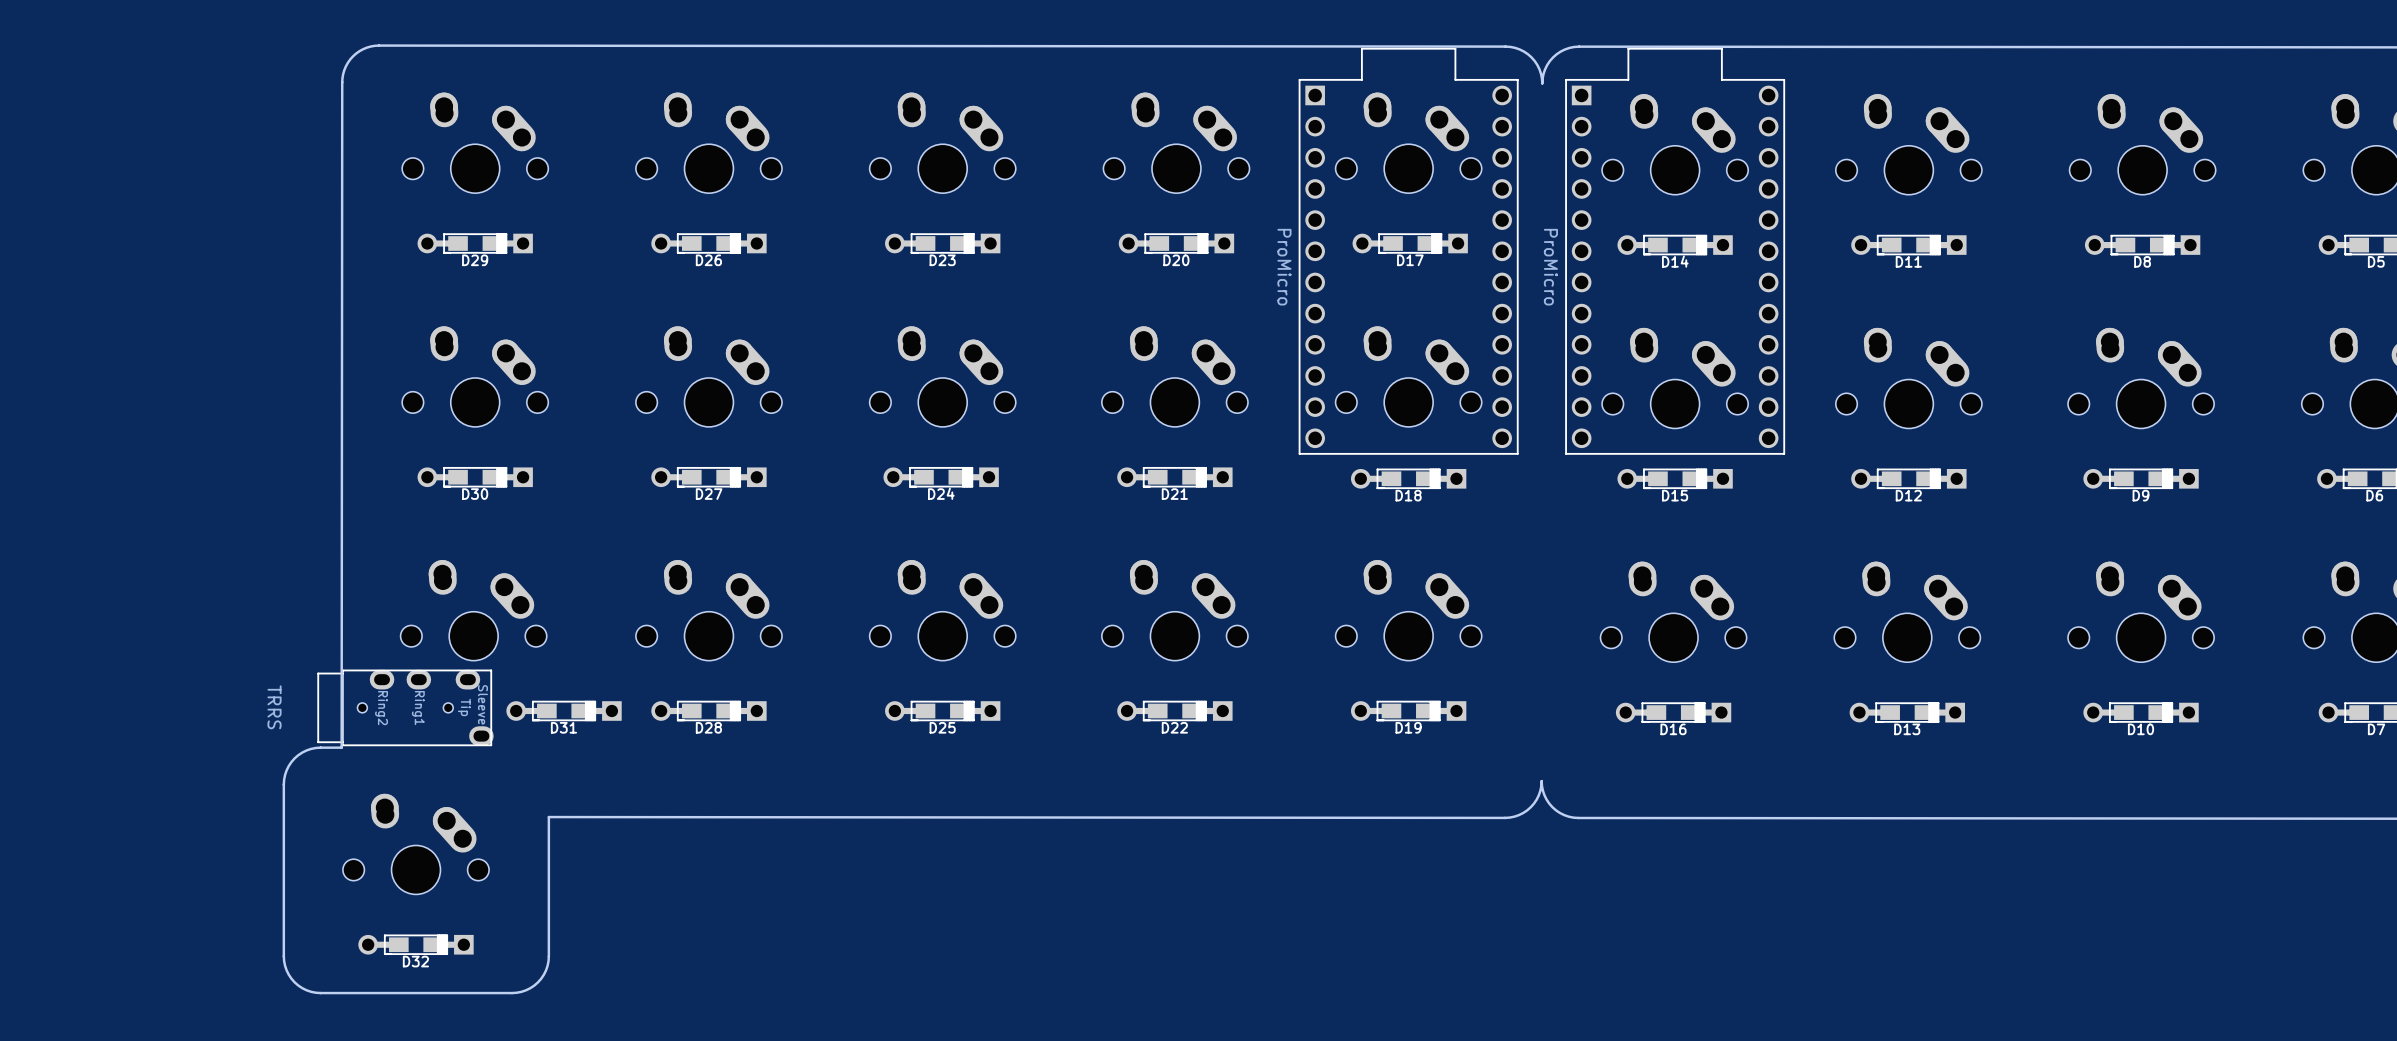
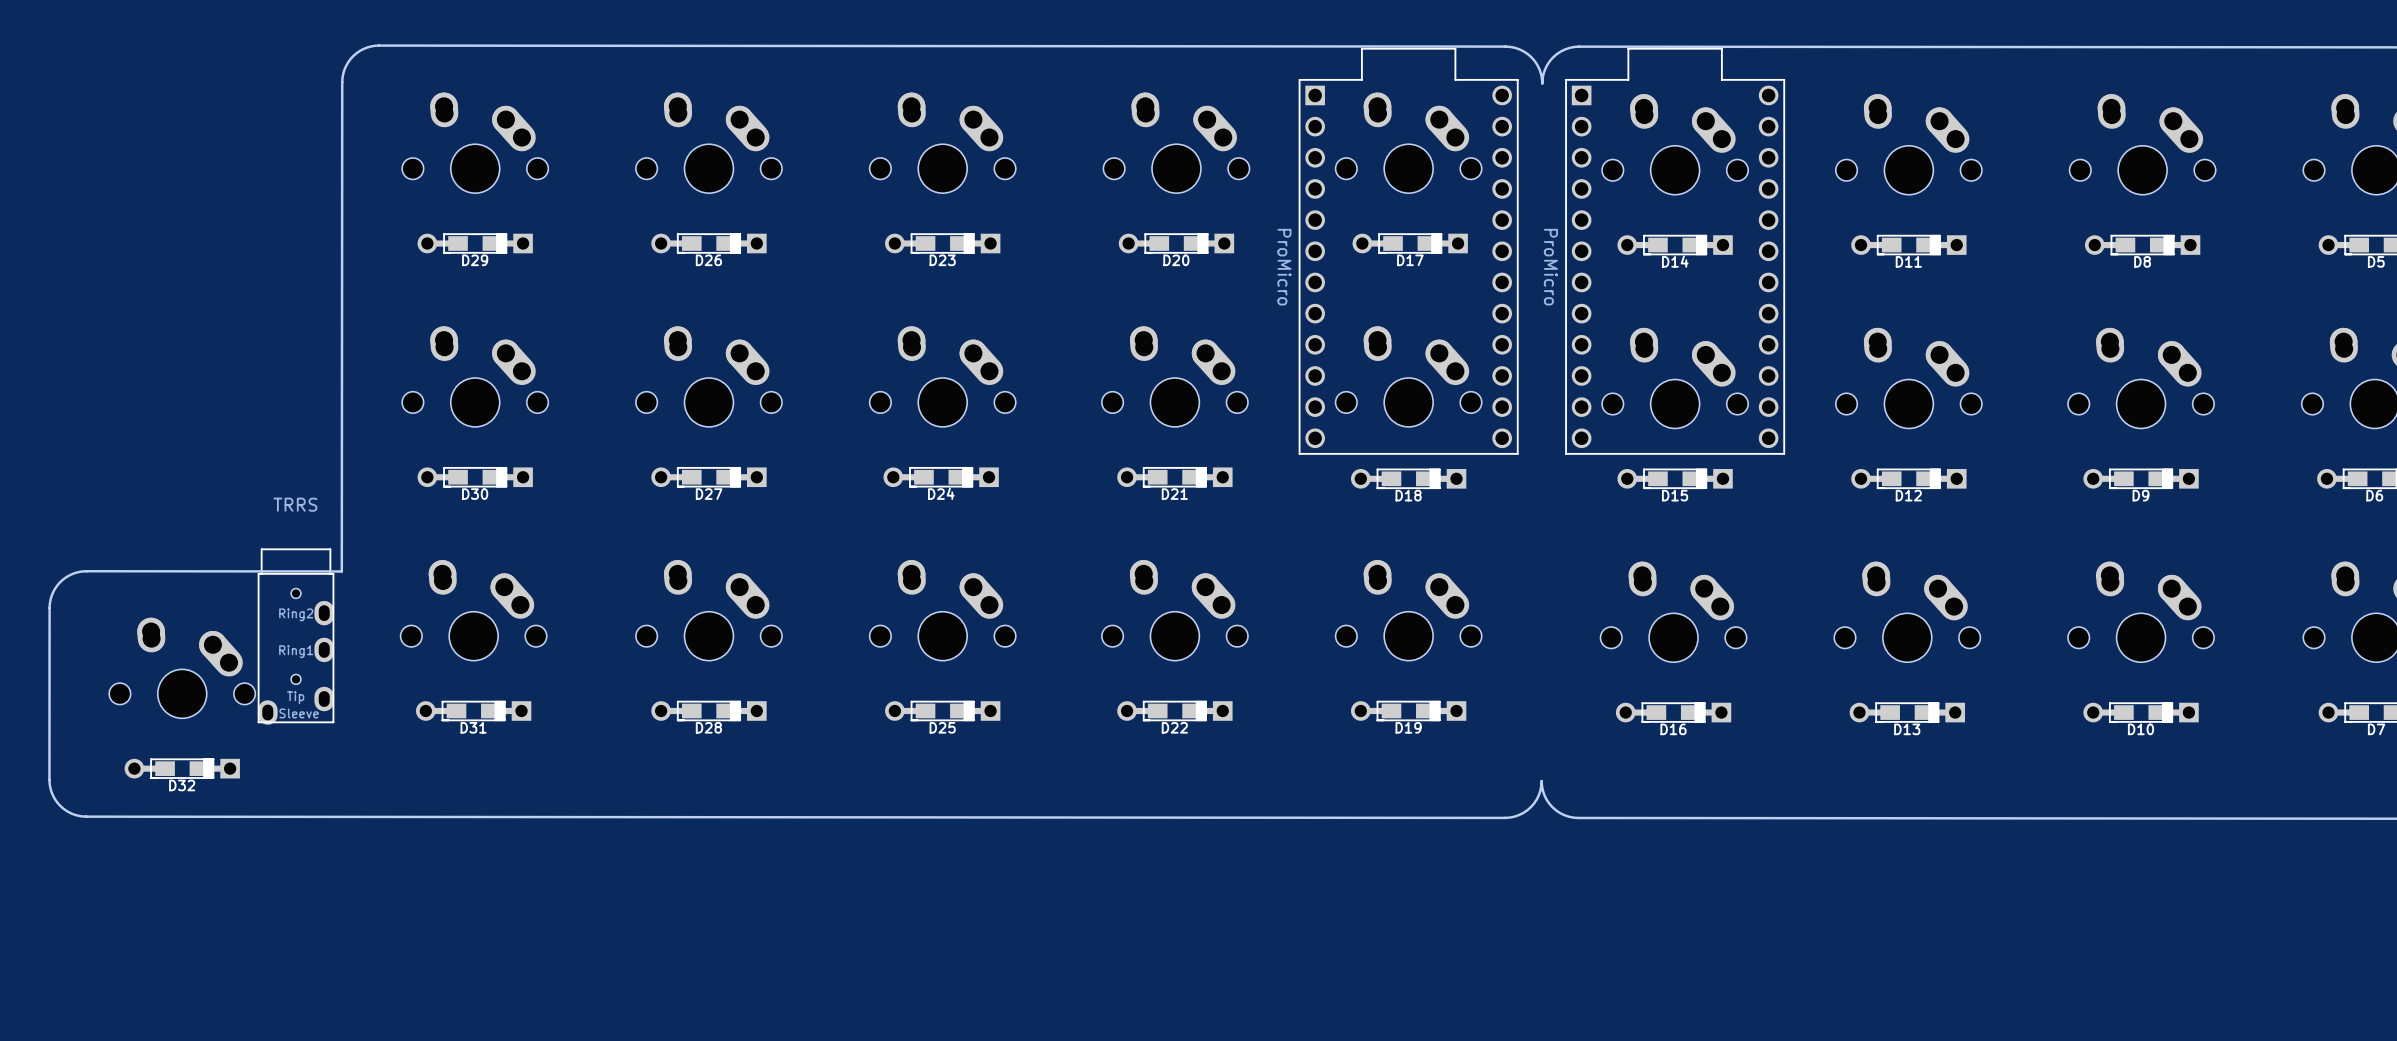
board edge: (341, 571) (341, 747) (315, 747) (302, 752) (291, 762) (284, 779) (283, 956) (286, 970) (291, 978) (306, 990) (320, 993) (512, 993) (530, 988) (541, 978) (548, 961) (548, 817) -> (341, 571) (86, 571) (74, 573) (63, 579) (53, 592) (49, 608) (49, 779) (50, 789) (57, 802) (72, 813) (86, 816) (548, 817)
part rotation: 0° (405, 707) -> 90° clockwise (296, 636)
part position: (405, 707) -> (296, 636)
D31 position: (564, 710) -> (473, 710)
part position: (416, 844) -> (182, 668)
D32 position: (416, 944) -> (182, 768)

